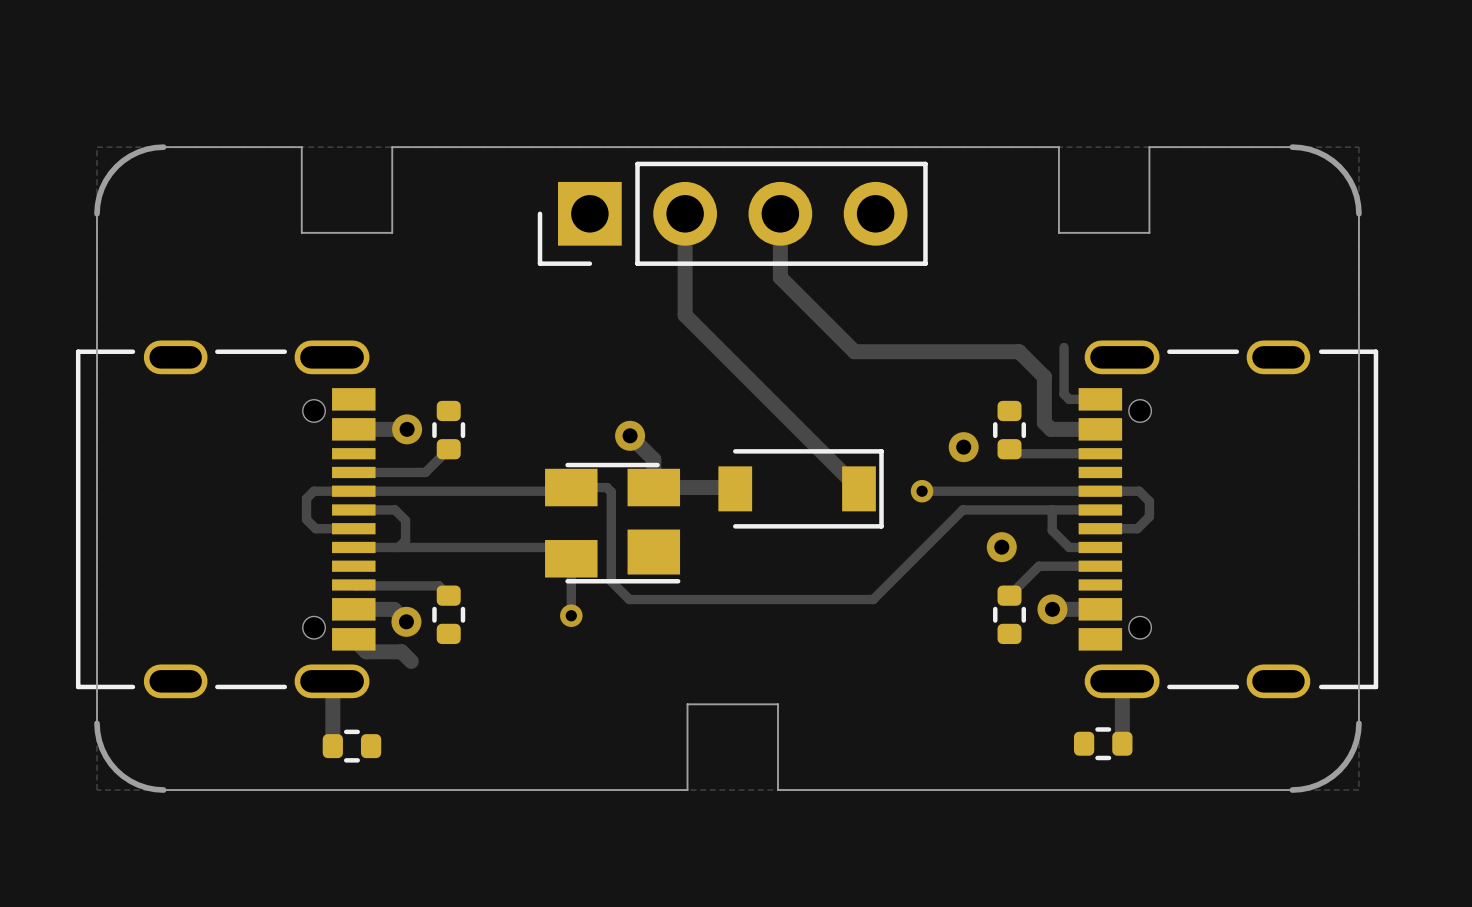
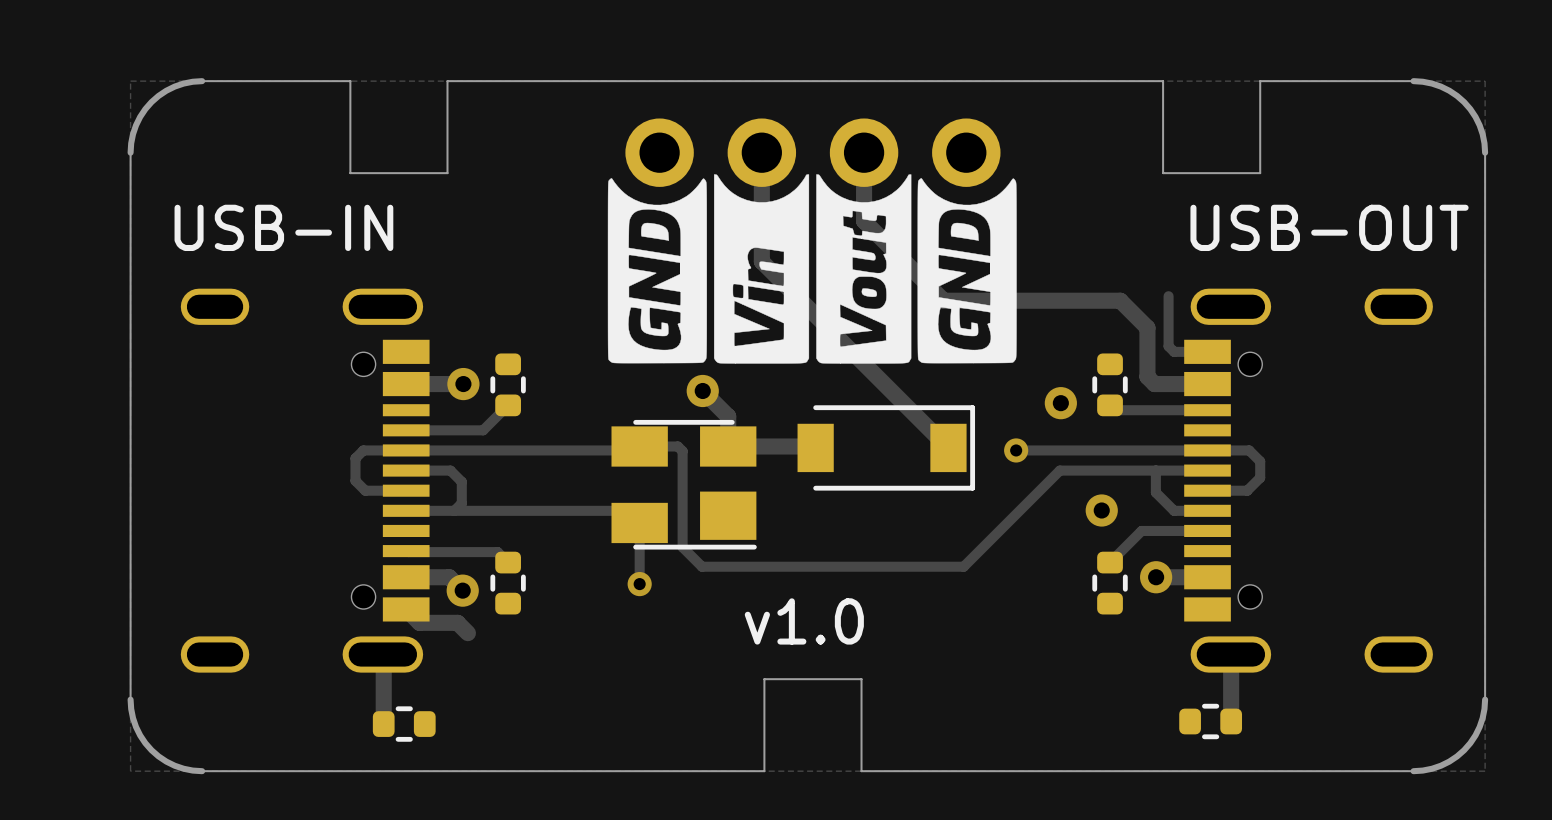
part footprint: [537, 161, 928, 266] -> [625, 118, 1001, 187]
drawing: none -> [607, 174, 1017, 364]
text: none -> USB-IN (283, 227)
text: none -> USB-OUT (1329, 227)
part footprint: [75, 340, 376, 699] -> [180, 288, 430, 673]
part footprint: [1078, 340, 1379, 699] -> [1184, 288, 1433, 673]
text: none -> v1.0 (804, 621)

